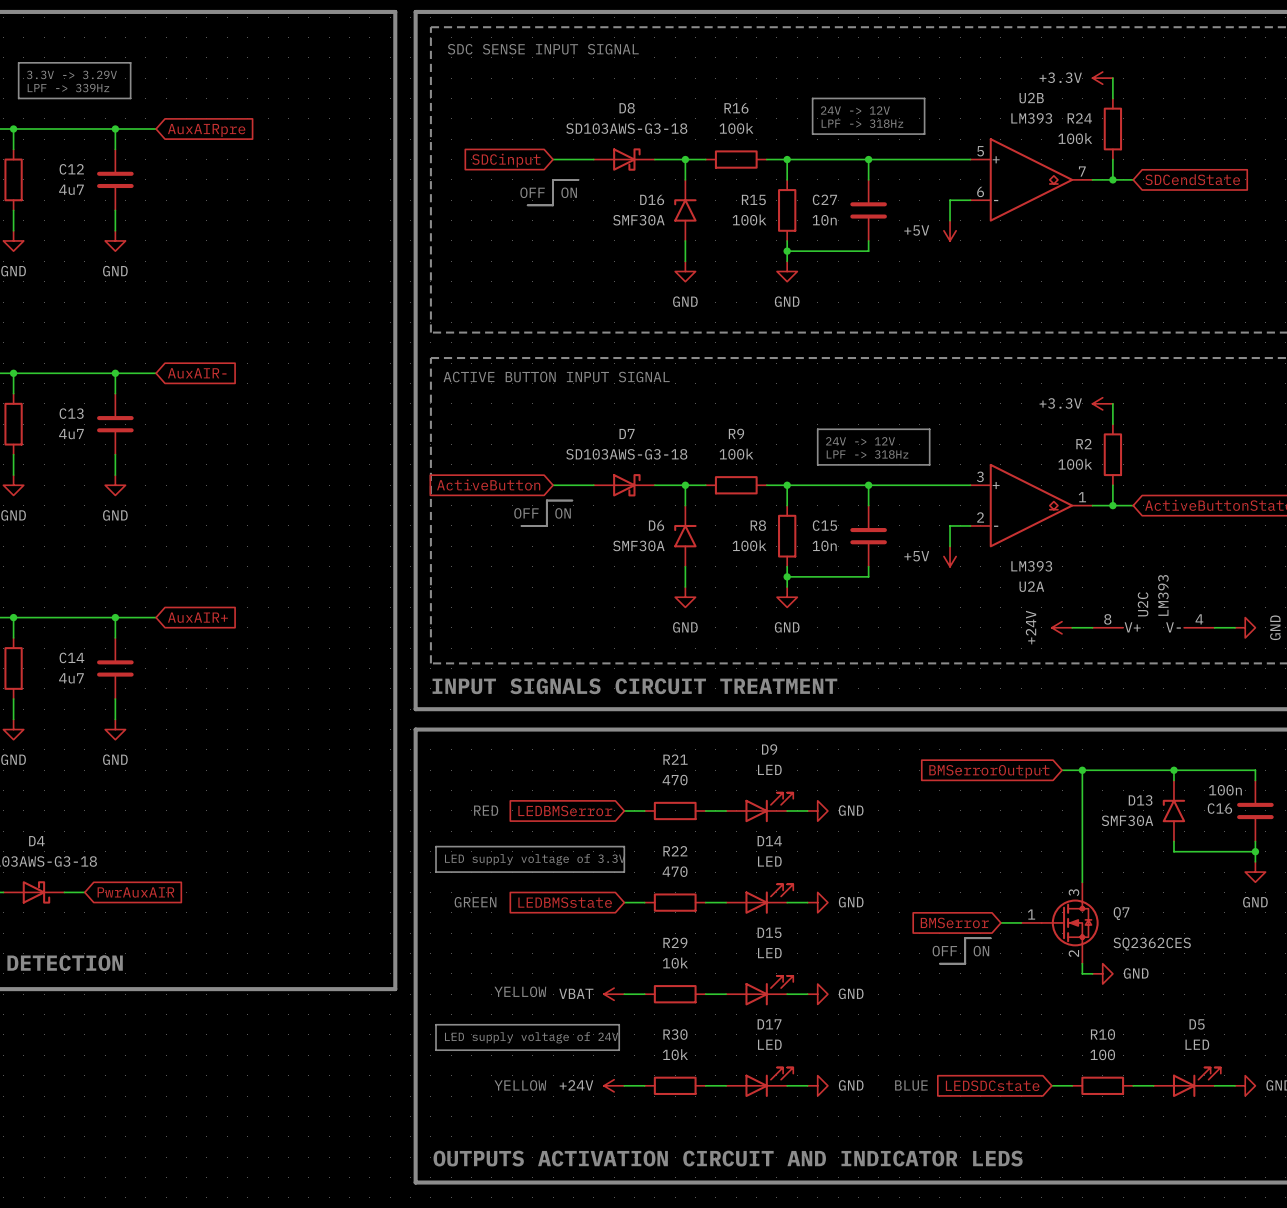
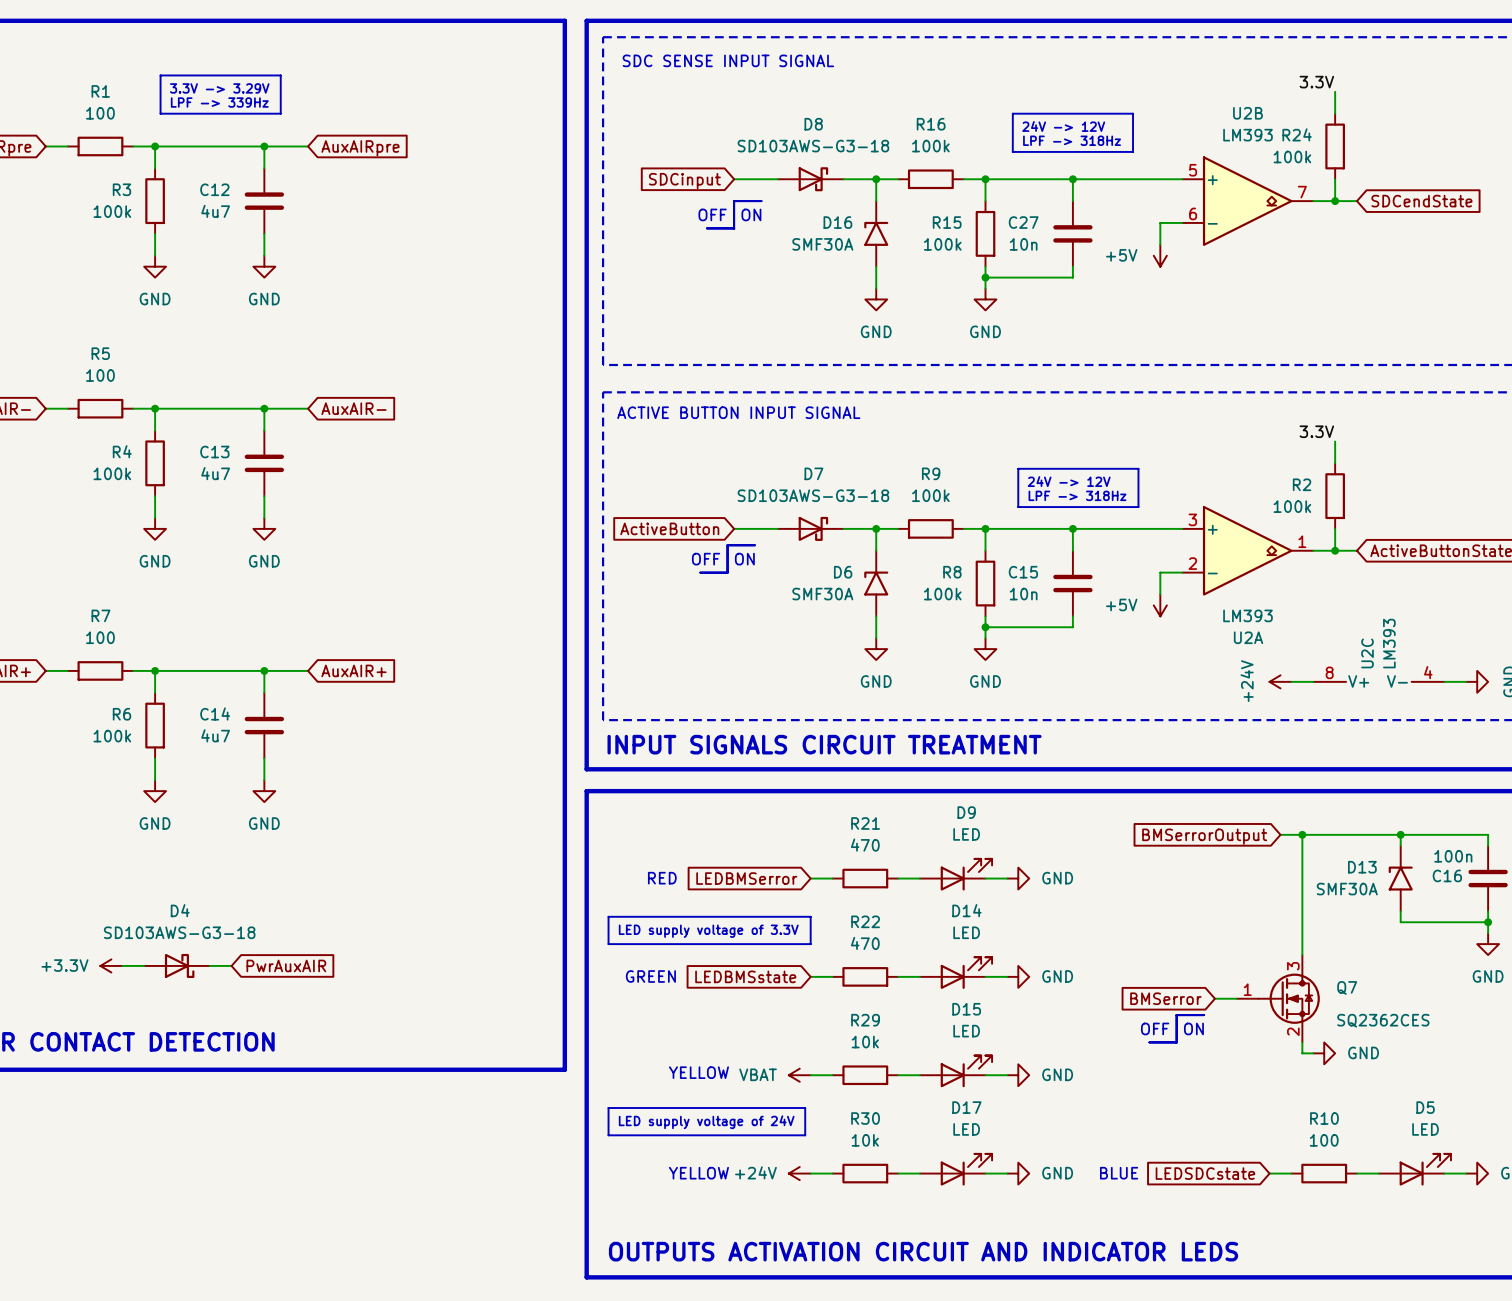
label: none -> 3.3V (1316, 82)
power symbol: +3.3V (1102, 78) -> none
label: none -> 3.3V (1316, 431)
power symbol: +3.3V (1102, 403) -> none

